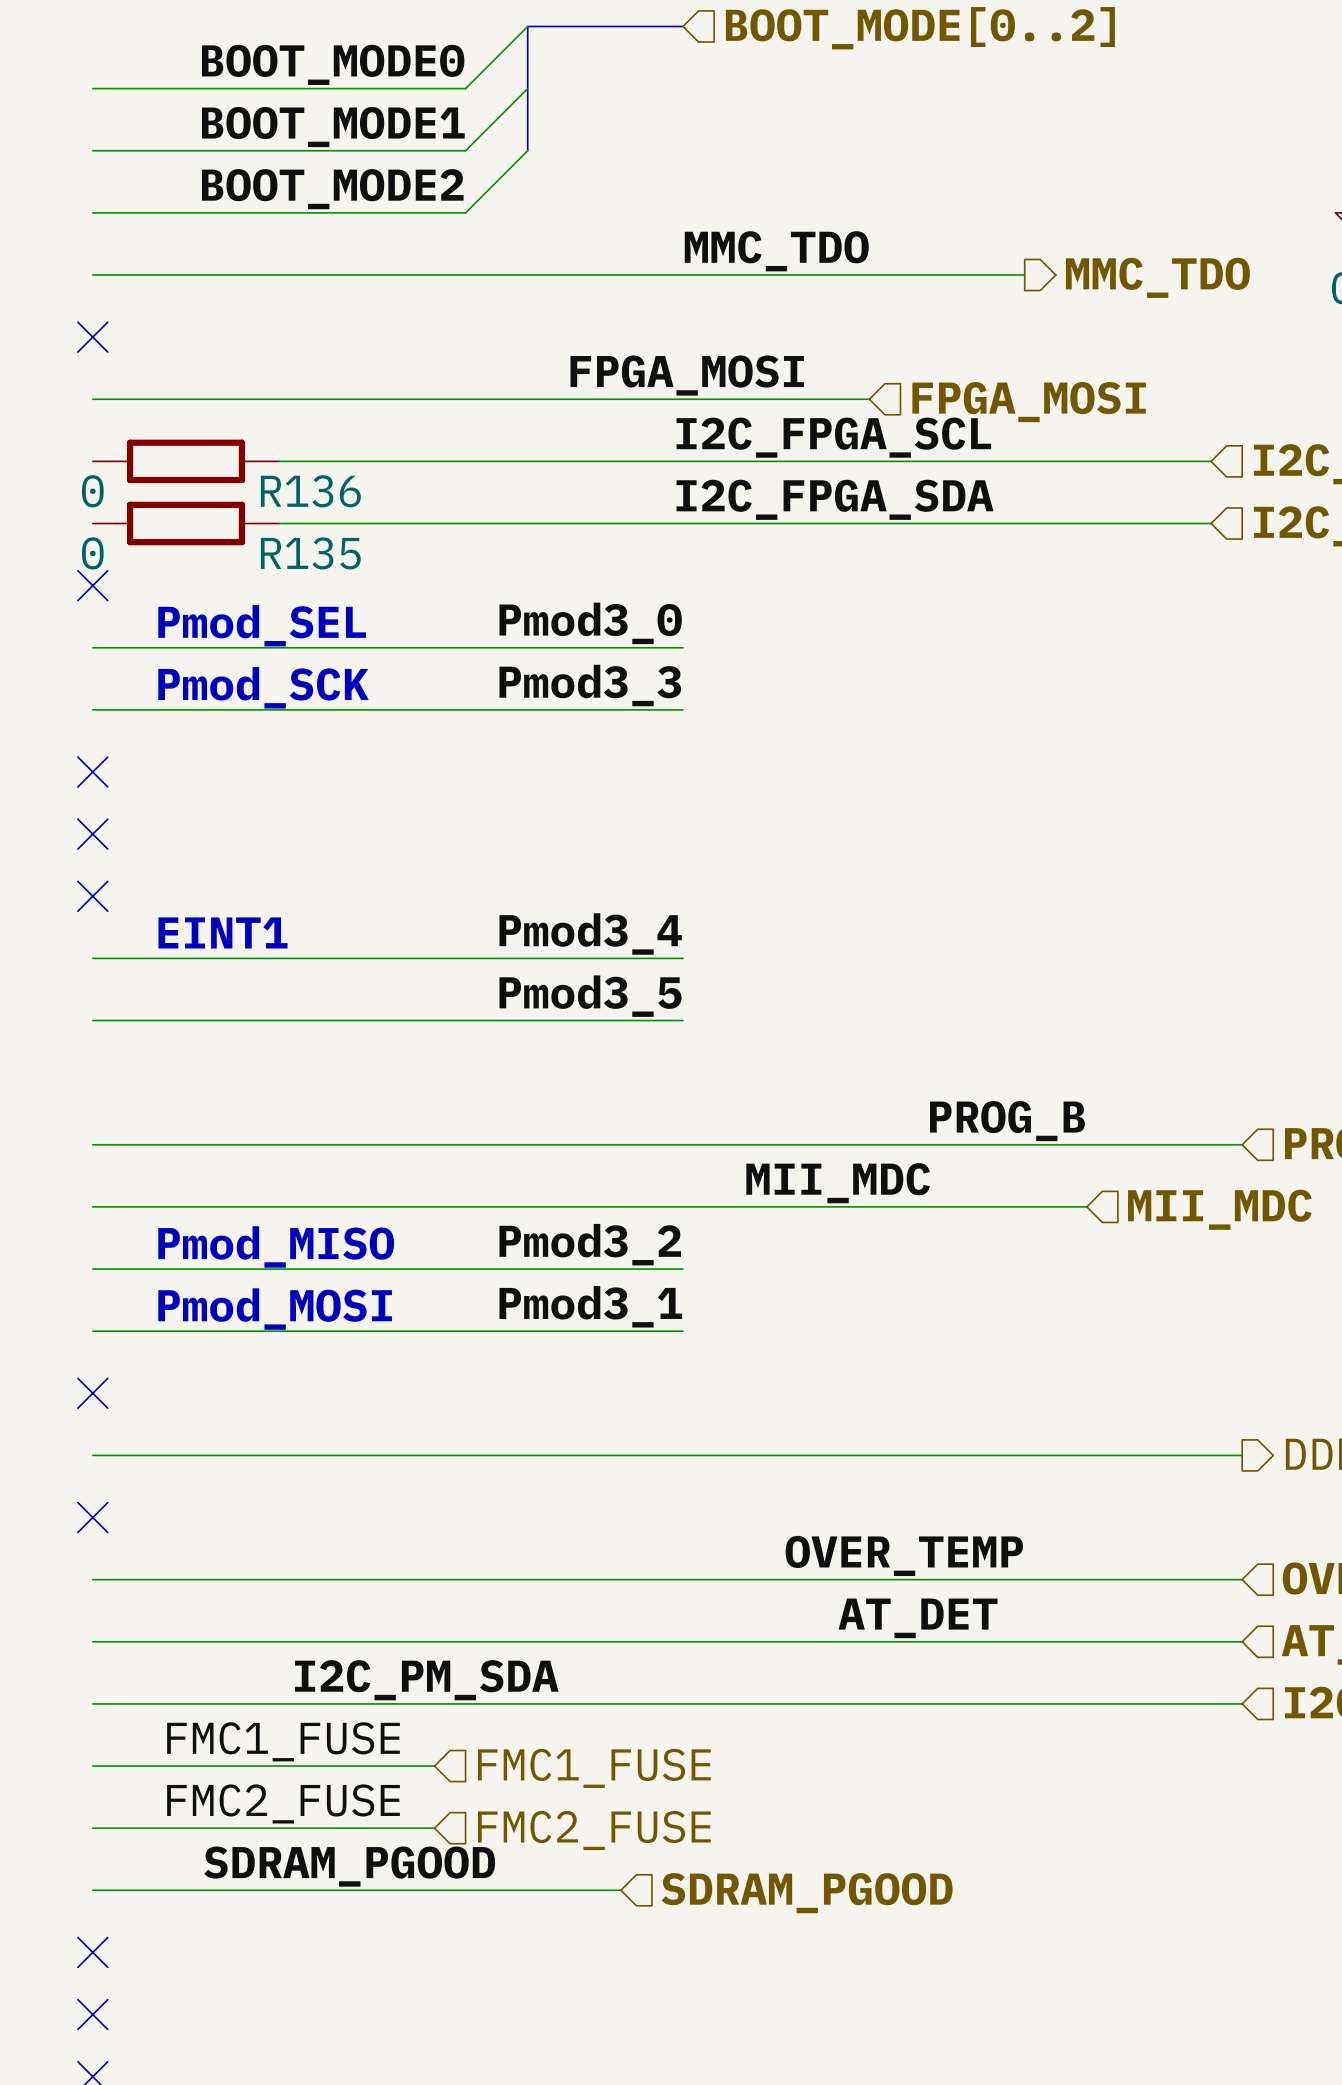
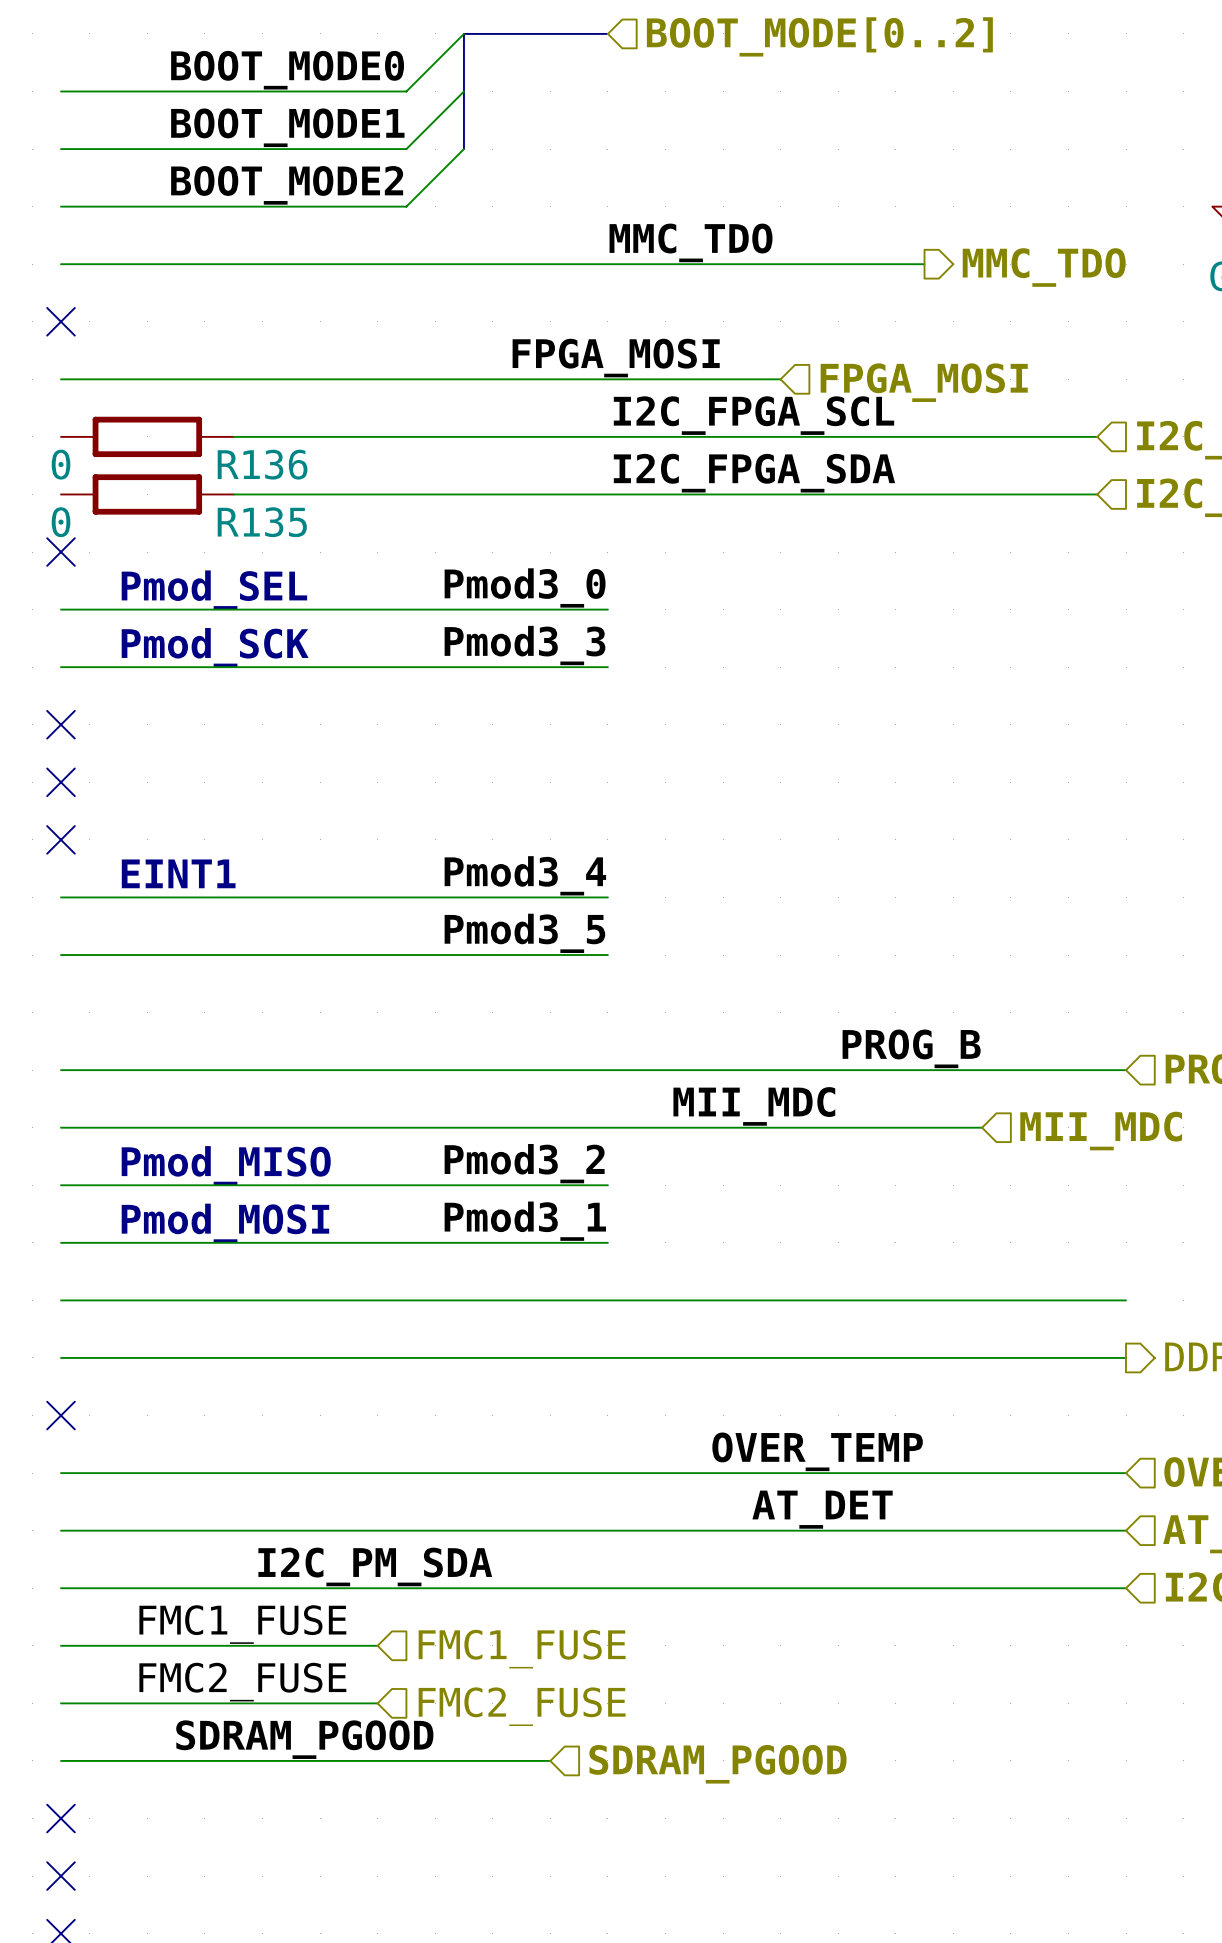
wire: none -> (61, 1300) (1126, 1300)
no-connect mark: (92, 1393) -> none

